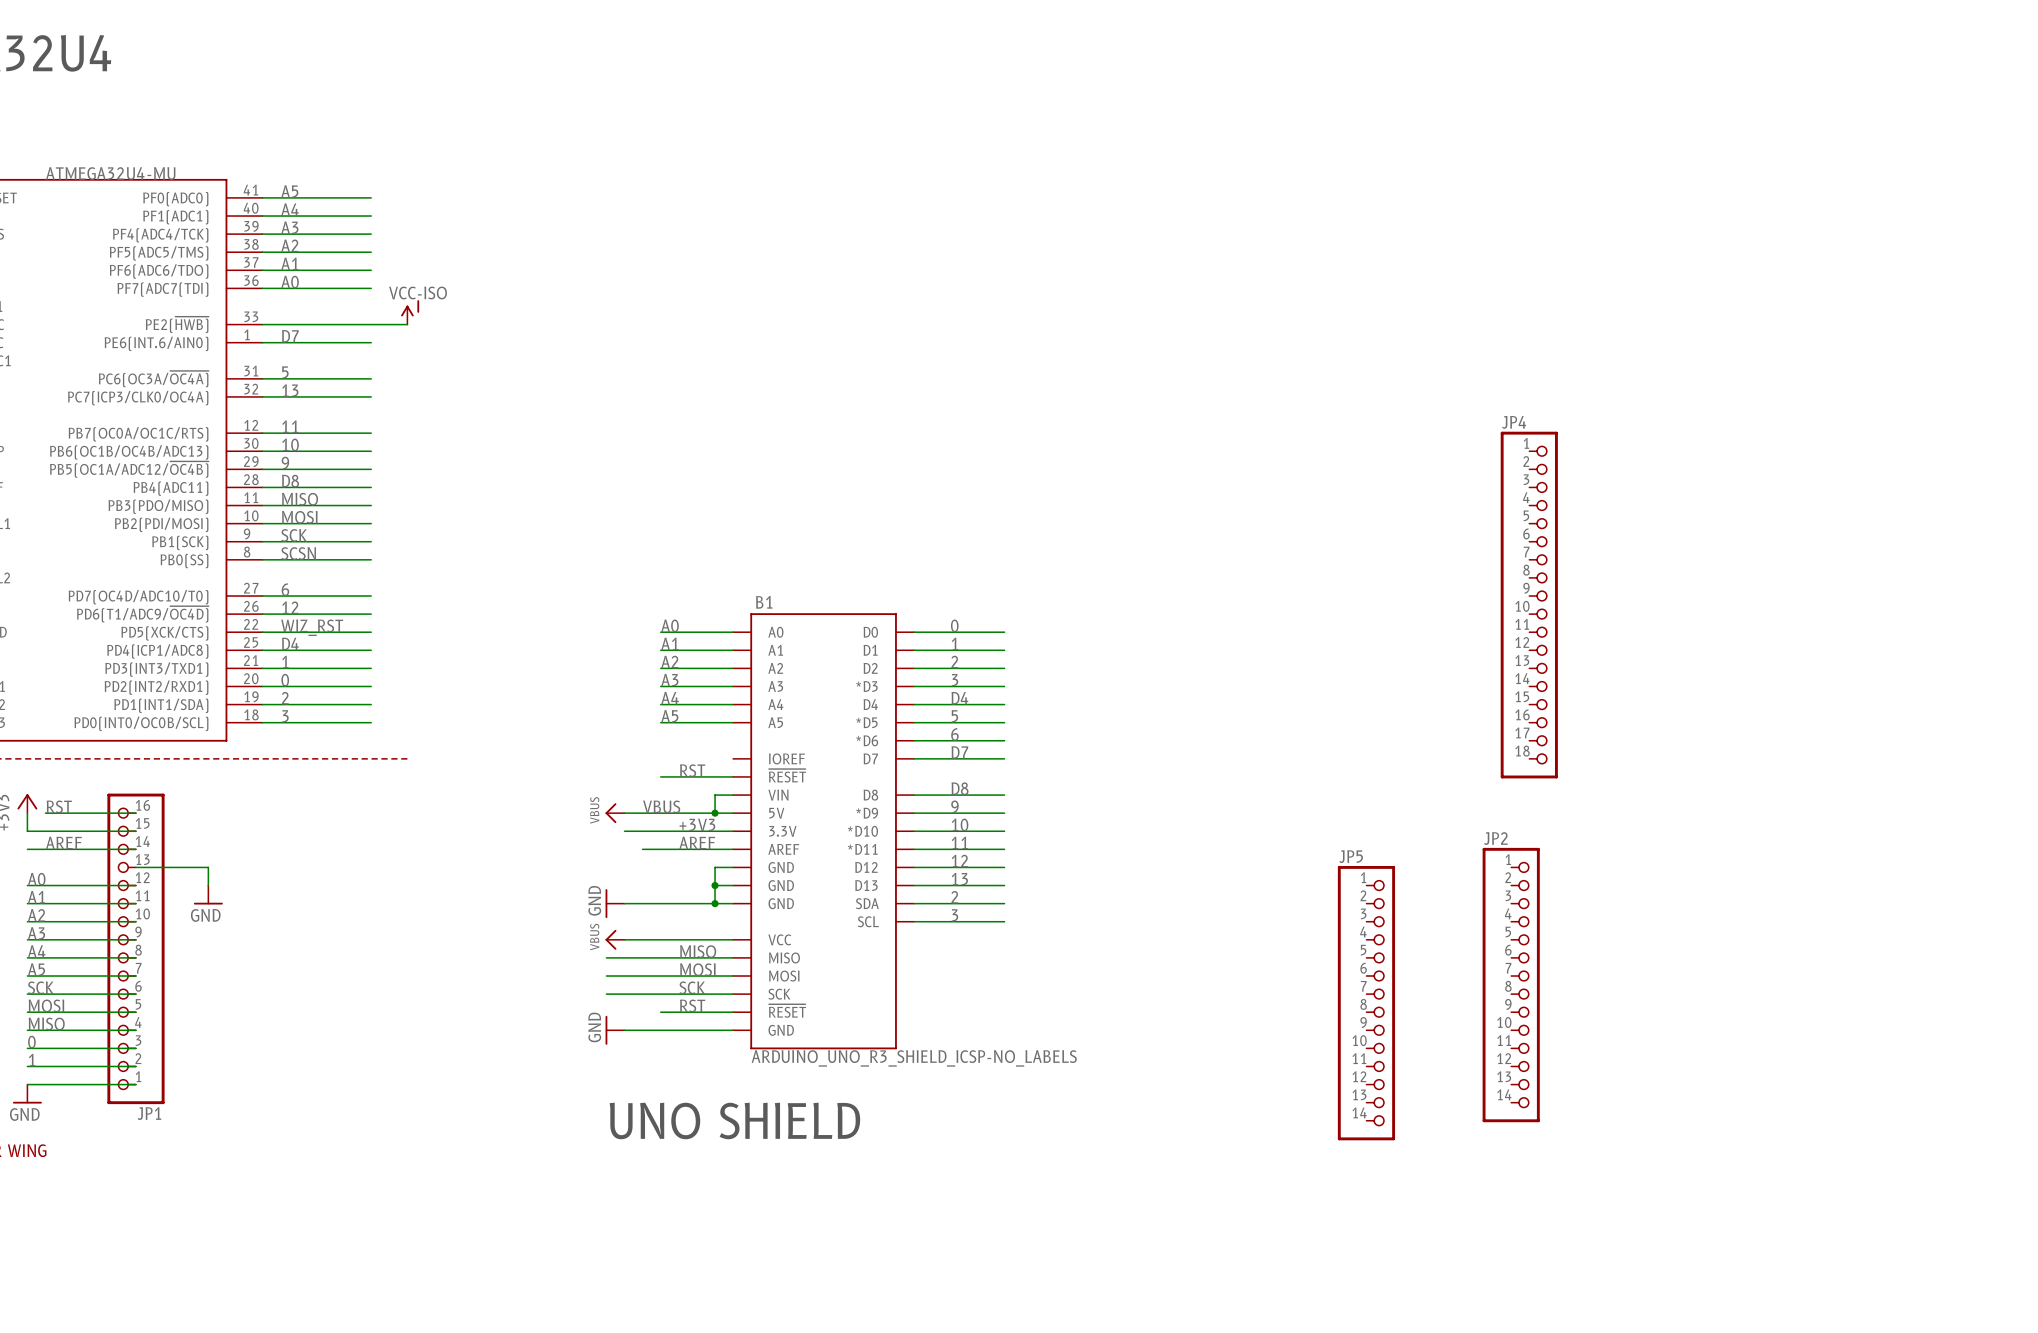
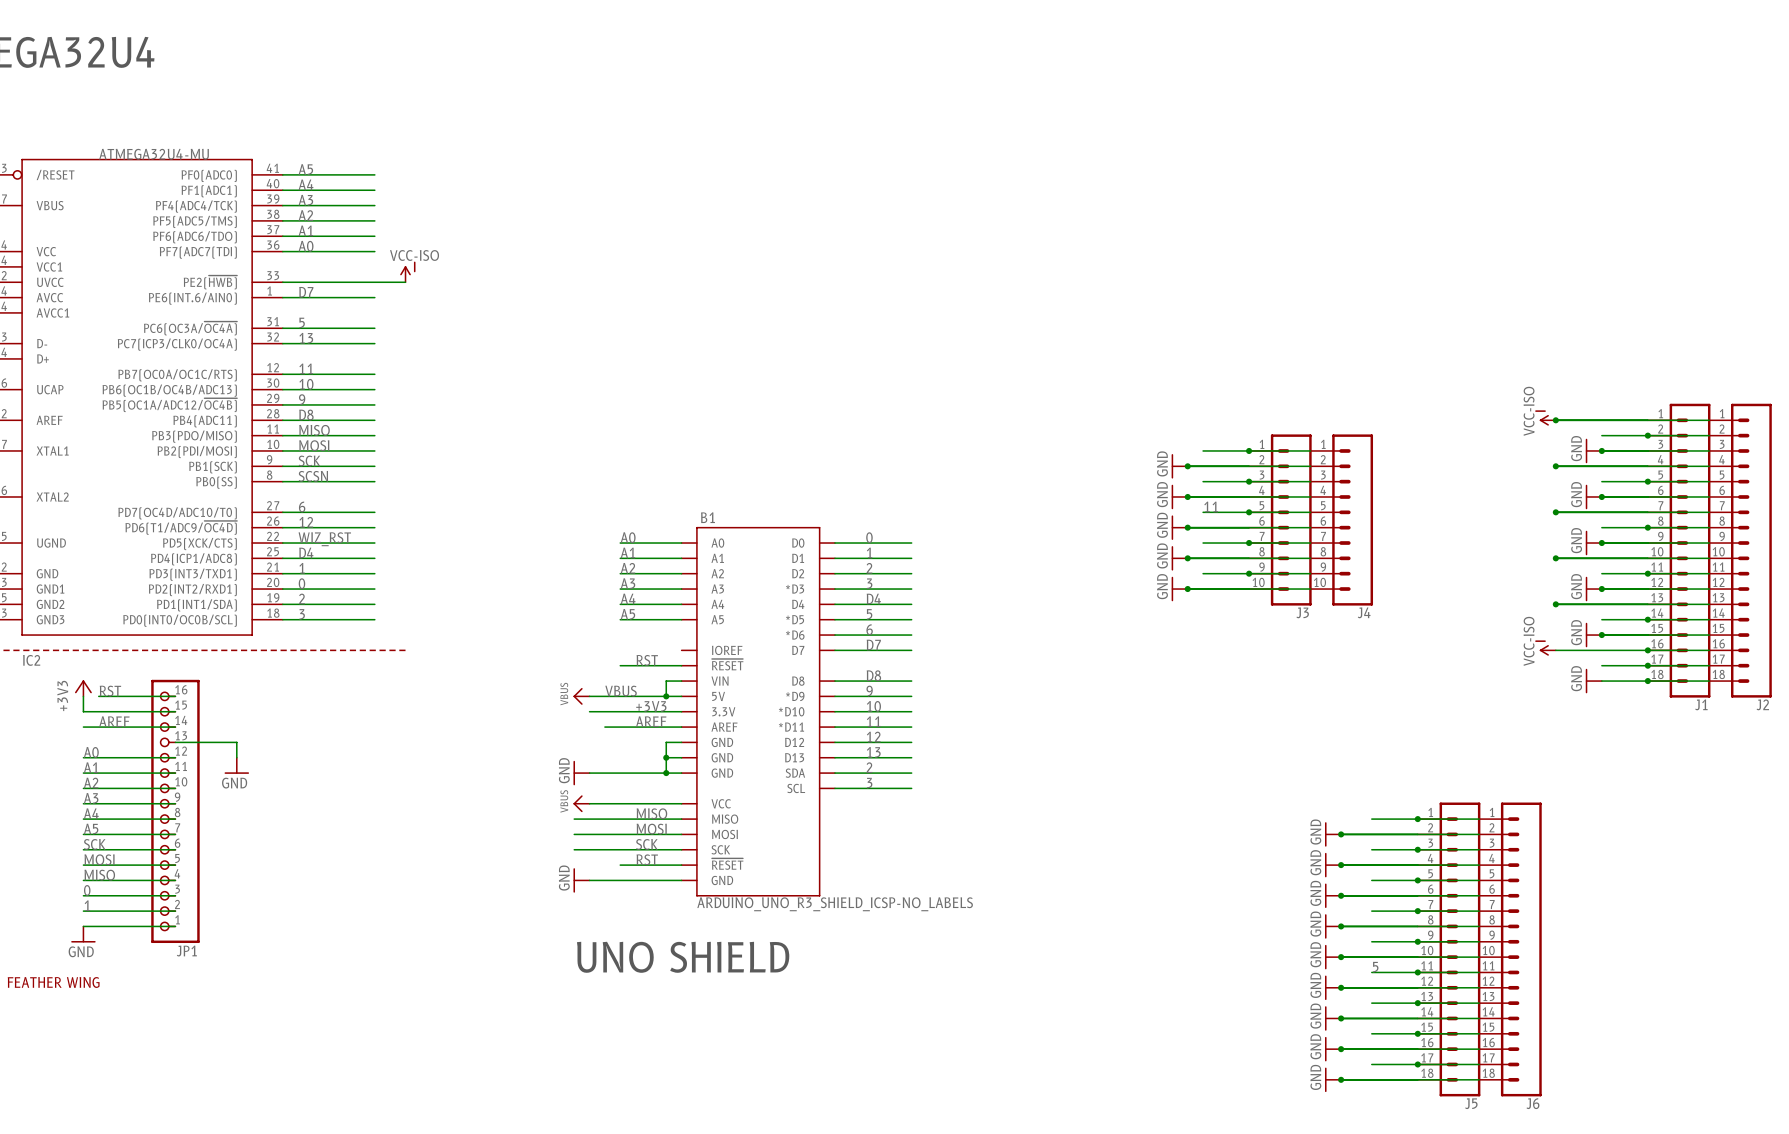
power symbol: none -> VCC-ISO (1545, 418)
wire: none -> (1555, 420) (1709, 420)
junction: none -> (1555, 420)
wire: none -> (1601, 435) (1709, 435)
junction: none -> (1647, 435)
wire: none -> (1203, 450) (1310, 450)
junction: none -> (1249, 450)
power symbol: none -> GND (1593, 450)
wire: none -> (1601, 450) (1709, 450)
junction: none -> (1601, 450)
power symbol: none -> GND (1179, 466)
wire: none -> (1187, 466) (1310, 466)
junction: none -> (1187, 466)
wire: none -> (1555, 466) (1709, 466)
junction: none -> (1555, 466)
wire: none -> (1203, 481) (1310, 481)
junction: none -> (1249, 481)
wire: none -> (1601, 481) (1709, 481)
junction: none -> (1647, 481)
power symbol: none -> GND (1179, 496)
wire: none -> (1187, 496) (1310, 496)
junction: none -> (1187, 496)
power symbol: none -> GND (1593, 496)
wire: none -> (1601, 496) (1709, 496)
junction: none -> (1601, 496)
label: none -> 11 (1211, 506)
wire: none -> (1203, 512) (1310, 512)
junction: none -> (1249, 512)
wire: none -> (1555, 512) (1709, 512)
junction: none -> (1555, 512)
J3: none -> (1280, 520)
J4: none -> (1341, 520)
JP4: (1529, 605) -> none
power symbol: none -> GND (1179, 527)
wire: none -> (1187, 527) (1310, 527)
junction: none -> (1187, 527)
wire: none -> (1601, 527) (1709, 527)
junction: none -> (1647, 527)
wire: none -> (1203, 543) (1310, 543)
junction: none -> (1249, 543)
power symbol: none -> GND (1593, 543)
wire: none -> (1601, 543) (1709, 543)
junction: none -> (1601, 543)
J1: none -> (1679, 550)
J2: none -> (1740, 550)
power symbol: none -> GND (1179, 558)
wire: none -> (1187, 558) (1310, 558)
junction: none -> (1187, 558)
wire: none -> (1555, 558) (1709, 558)
junction: none -> (1555, 558)
wire: none -> (1203, 573) (1310, 573)
junction: none -> (1249, 573)
wire: none -> (1601, 573) (1709, 573)
junction: none -> (1647, 573)
power symbol: none -> GND (1179, 589)
wire: none -> (1187, 589) (1310, 589)
junction: none -> (1187, 589)
power symbol: none -> GND (1593, 589)
wire: none -> (1601, 589) (1709, 589)
junction: none -> (1601, 589)
wire: none -> (1555, 604) (1709, 604)
junction: none -> (1555, 604)
wire: none -> (1601, 619) (1709, 619)
junction: none -> (1647, 619)
power symbol: none -> GND (1593, 635)
wire: none -> (1601, 635) (1709, 635)
junction: none -> (1601, 635)
power symbol: none -> VCC-ISO (1545, 648)
wire: none -> (1555, 650) (1709, 650)
junction: none -> (1647, 650)
wire: none -> (1601, 665) (1709, 665)
junction: none -> (1647, 665)
power symbol: none -> GND (1593, 681)
wire: none -> (1601, 681) (1709, 681)
junction: none -> (1647, 681)
wire: none -> (1371, 819) (1479, 819)
junction: none -> (1417, 819)
power symbol: none -> GND (1333, 834)
wire: none -> (1341, 834) (1479, 834)
junction: none -> (1341, 834)
JP2: (1511, 985) -> none
wire: none -> (1371, 849) (1479, 849)
junction: none -> (1417, 849)
JP5: (1366, 1003) -> none
power symbol: none -> GND (1333, 865)
wire: none -> (1341, 865) (1479, 865)
junction: none -> (1341, 865)
wire: none -> (1371, 880) (1479, 880)
junction: none -> (1417, 880)
power symbol: none -> GND (1333, 895)
wire: none -> (1341, 895) (1479, 895)
junction: none -> (1341, 895)
wire: none -> (1371, 911) (1479, 911)
junction: none -> (1417, 911)
power symbol: none -> GND (1333, 926)
wire: none -> (1341, 926) (1479, 926)
junction: none -> (1341, 926)
wire: none -> (1371, 941) (1479, 941)
junction: none -> (1417, 941)
J5: none -> (1449, 949)
J6: none -> (1510, 949)
power symbol: none -> GND (1333, 957)
wire: none -> (1341, 957) (1479, 957)
junction: none -> (1341, 957)
label: none -> 5 (1375, 967)
wire: none -> (1371, 972) (1479, 972)
junction: none -> (1417, 972)
power symbol: none -> GND (1333, 987)
wire: none -> (1341, 987) (1479, 987)
junction: none -> (1341, 987)
wire: none -> (1371, 1003) (1479, 1003)
junction: none -> (1417, 1003)
power symbol: none -> GND (1333, 1018)
wire: none -> (1341, 1018) (1479, 1018)
junction: none -> (1341, 1018)
wire: none -> (1371, 1033) (1479, 1033)
junction: none -> (1417, 1033)
power symbol: none -> GND (1333, 1049)
wire: none -> (1341, 1049) (1479, 1049)
junction: none -> (1341, 1049)
wire: none -> (1371, 1064) (1479, 1064)
junction: none -> (1417, 1064)
power symbol: none -> GND (1333, 1079)
wire: none -> (1341, 1079) (1479, 1079)
junction: none -> (1341, 1079)

